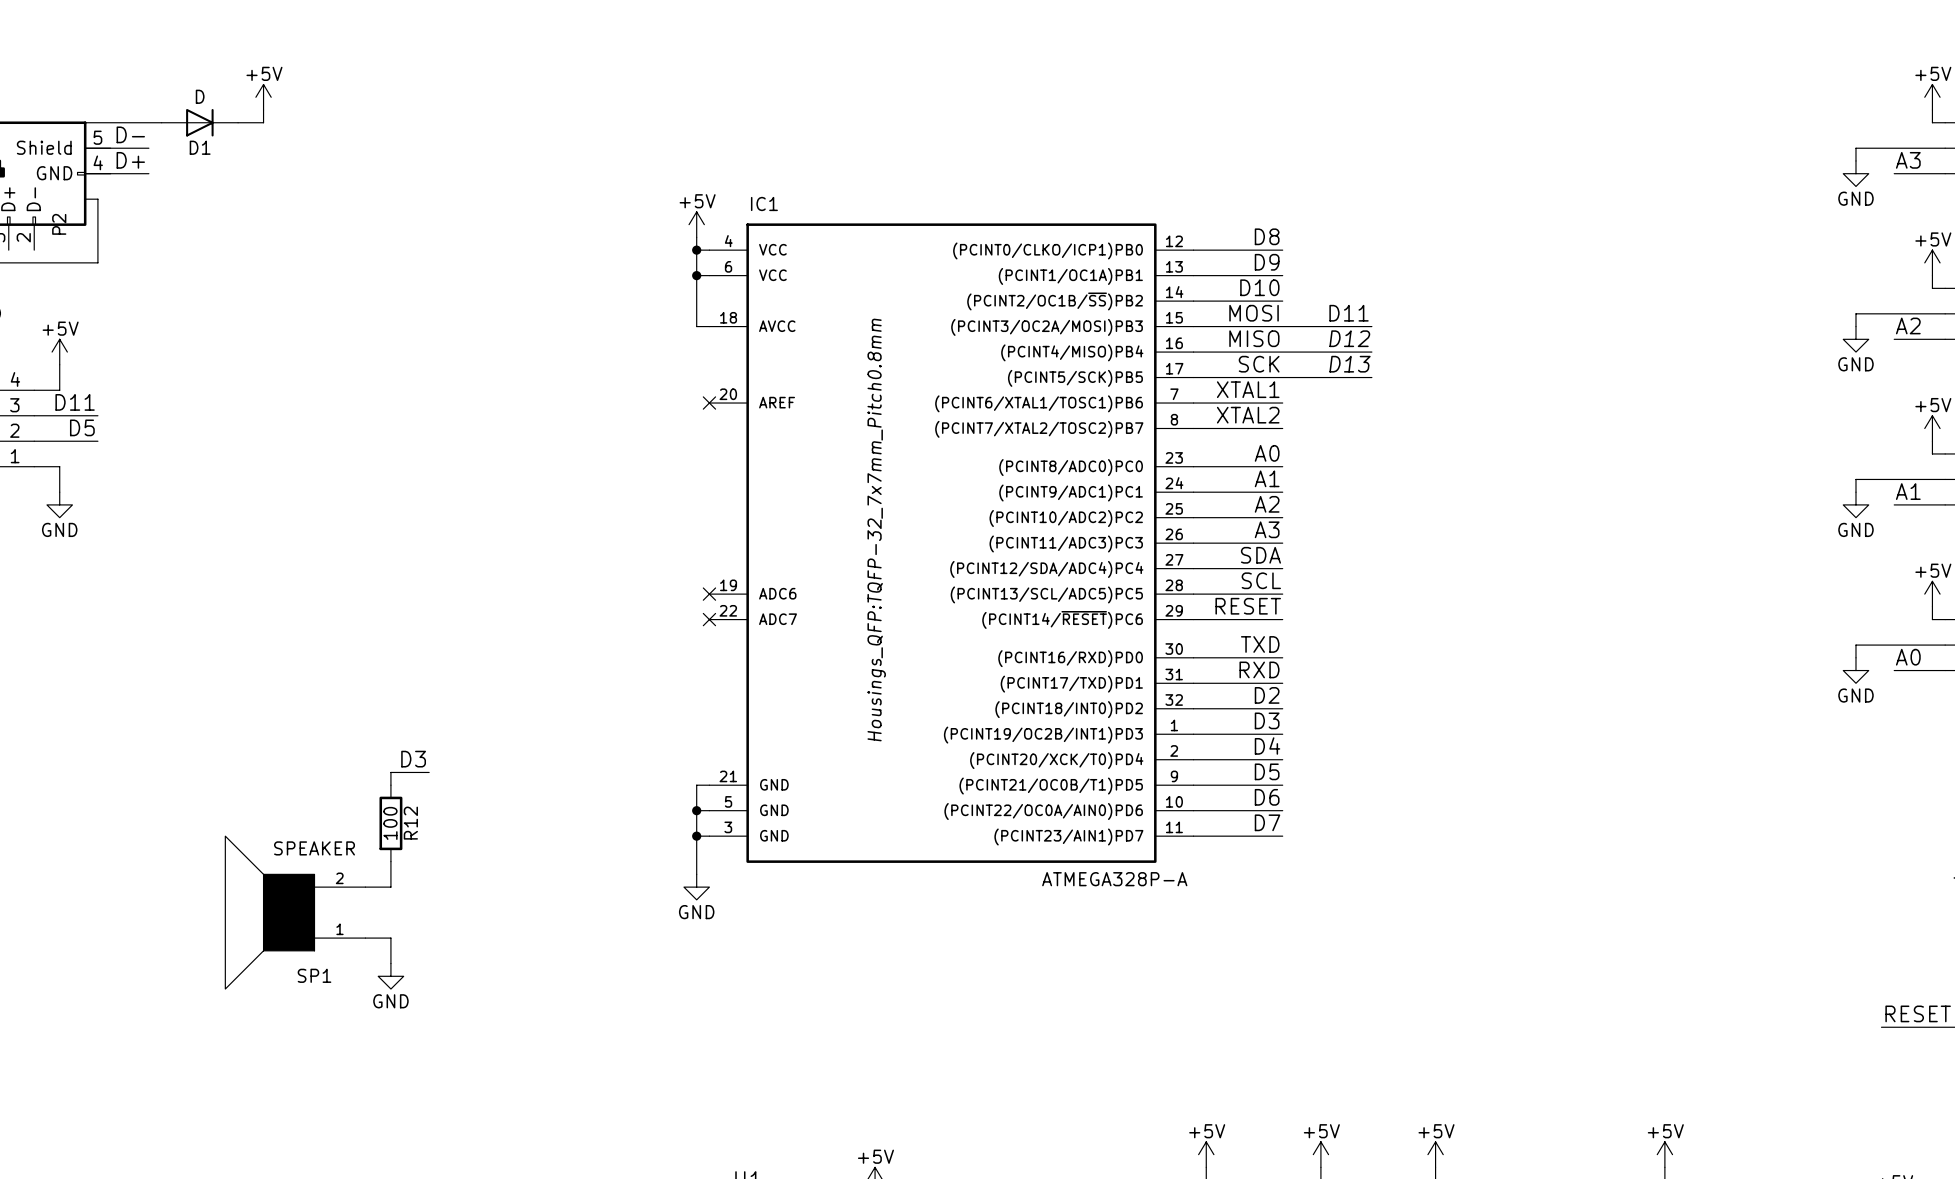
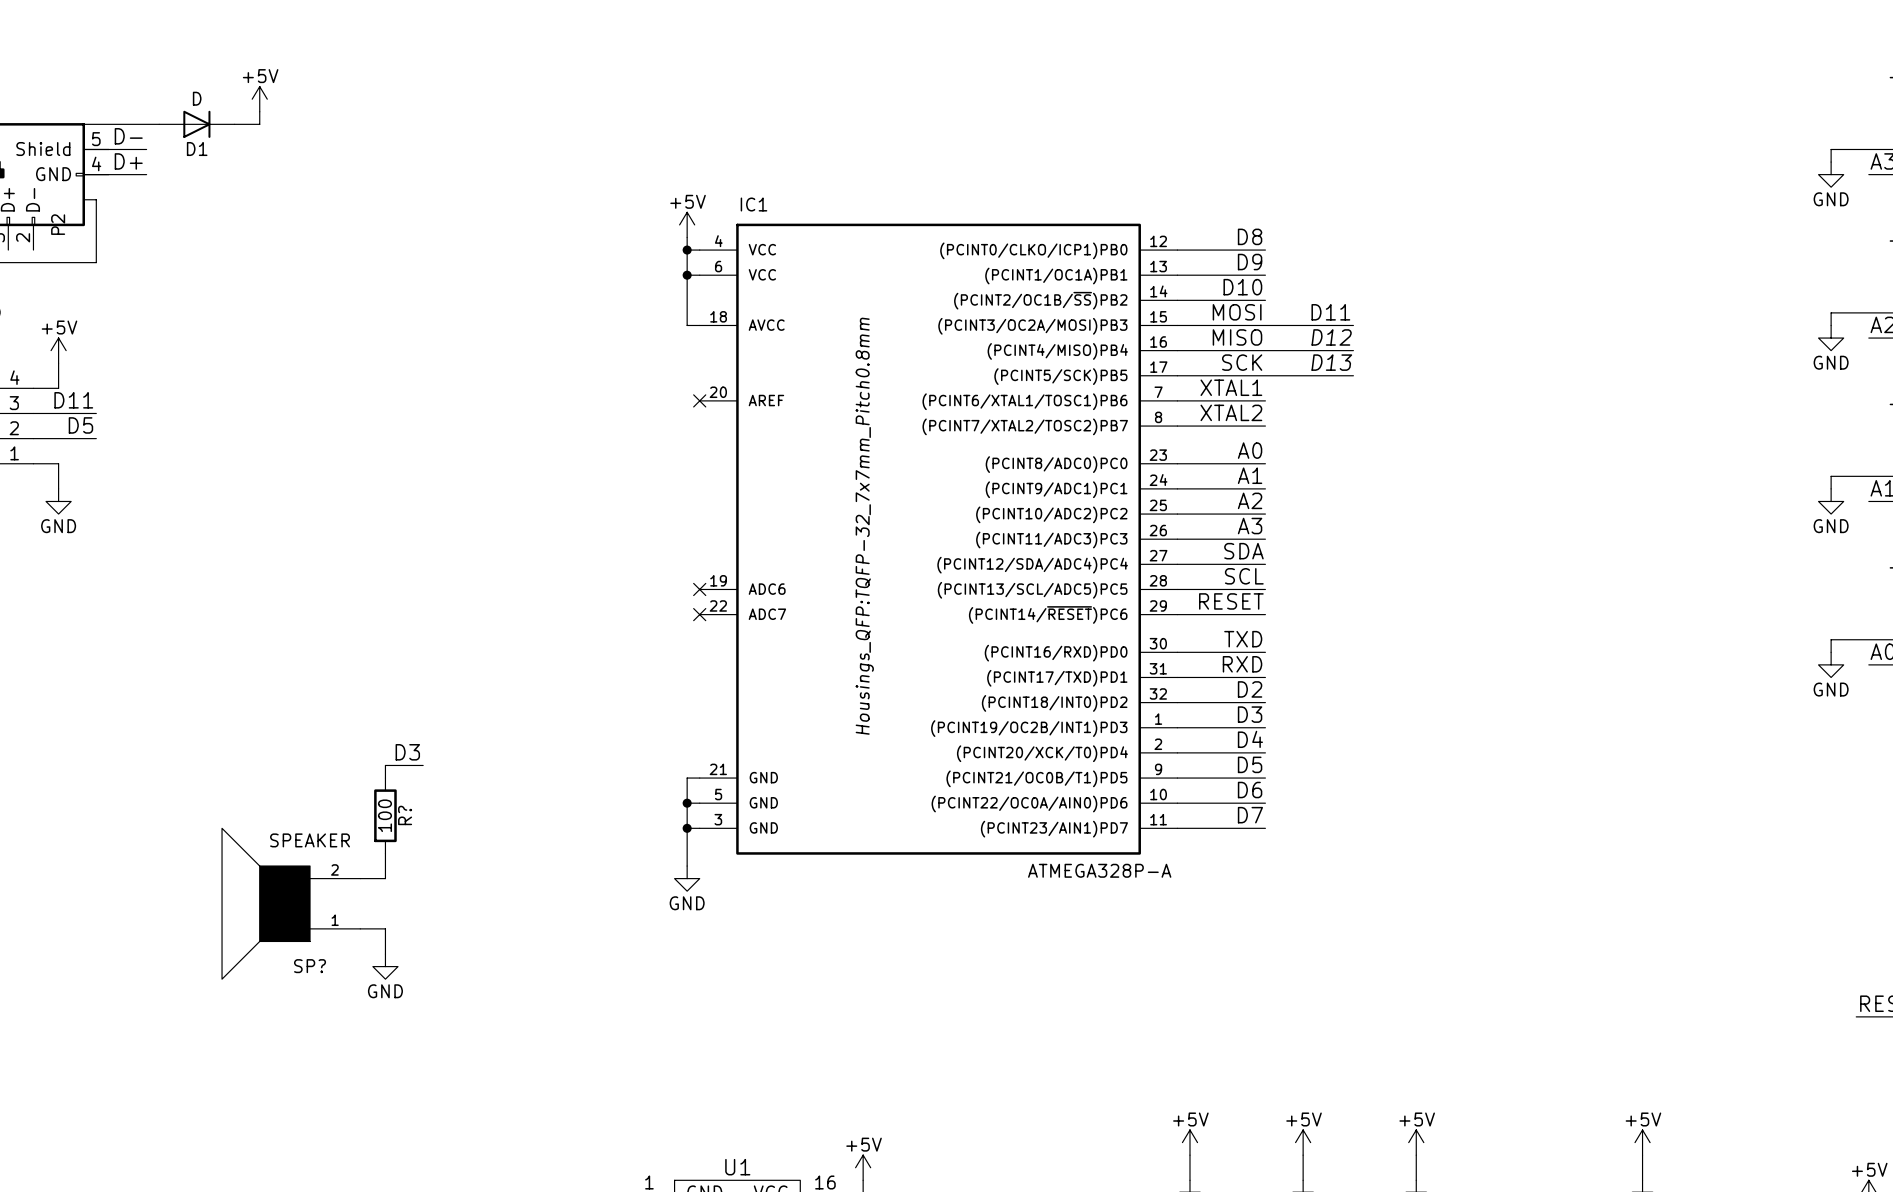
R12 name: R12 (410, 823) -> R? (405, 815)
SP1 name: SP1 (314, 975) -> SP? (310, 966)

